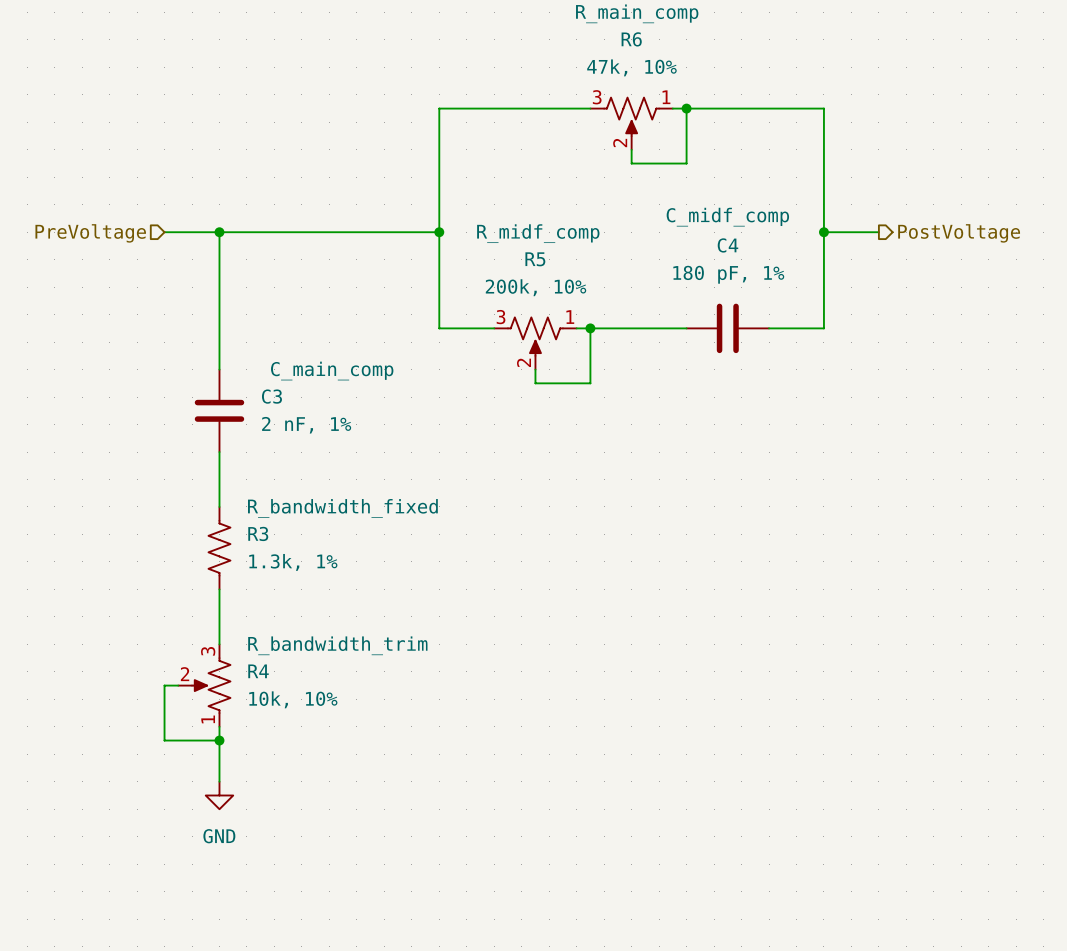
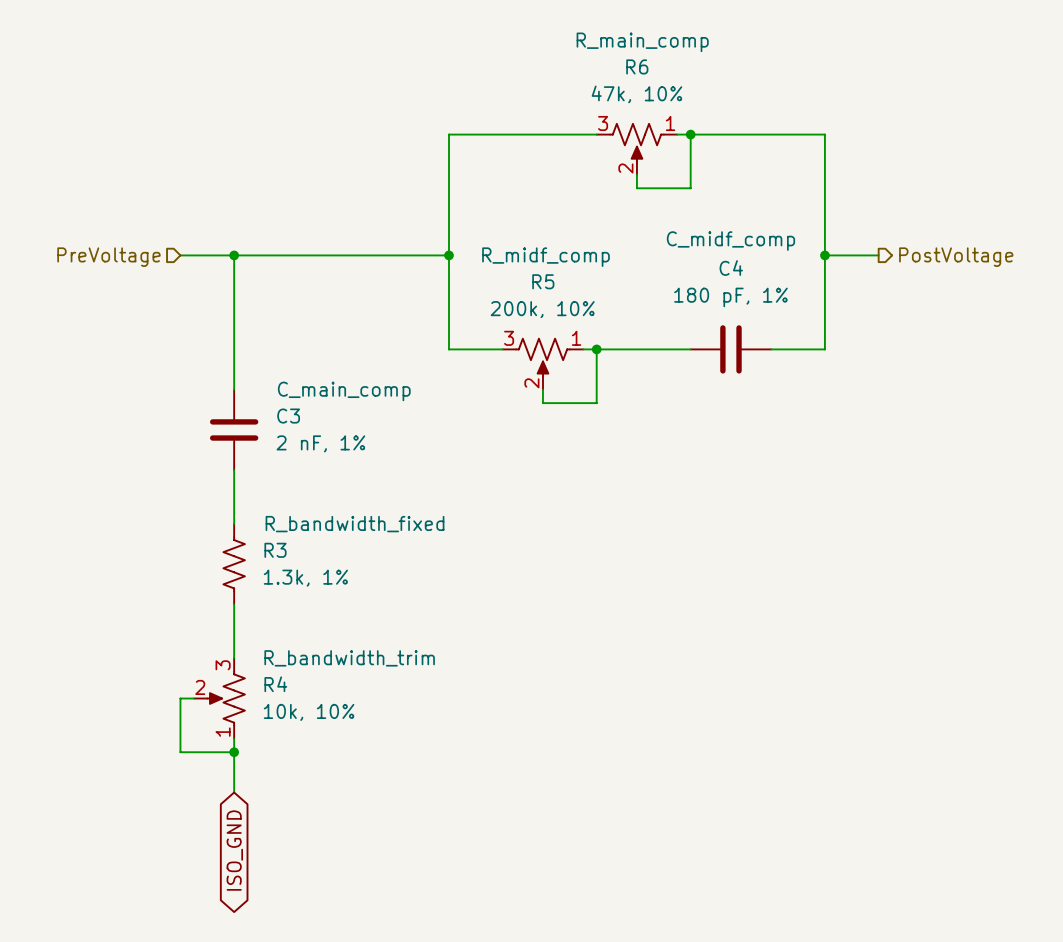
power symbol: GND (219, 795) -> none
global label: none -> ISO_GND (234, 850)

